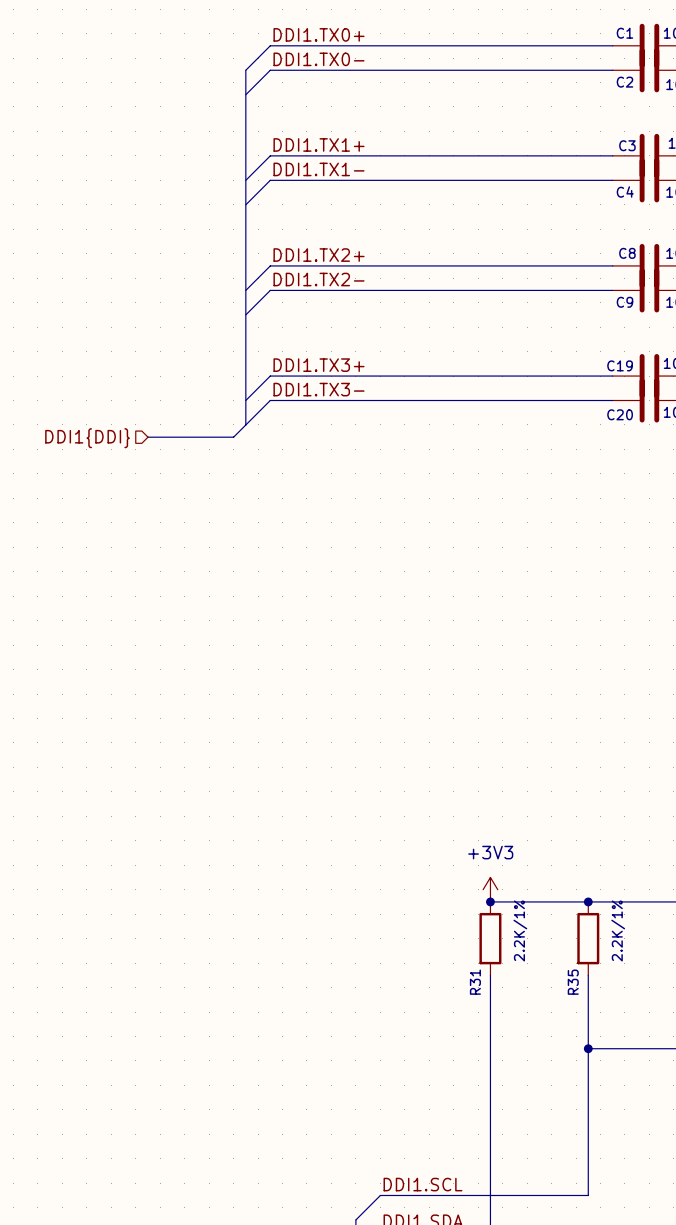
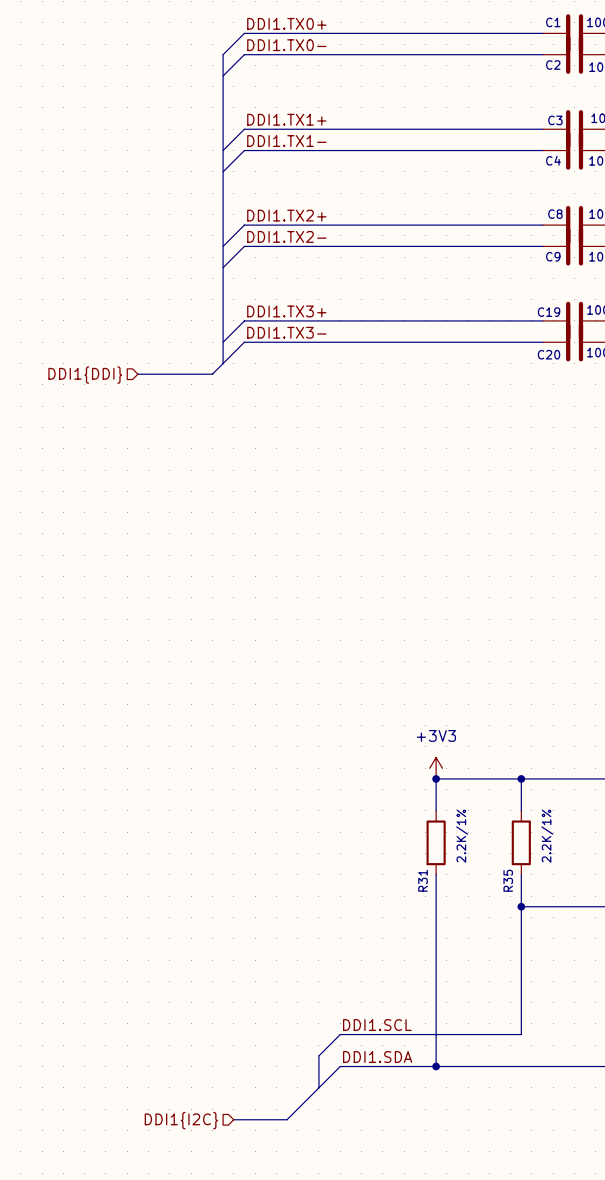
R31 position: (490, 938) -> (436, 842)
R35 position: (588, 938) -> (521, 842)
wire: (490, 975) (490, 1012) -> (436, 778) (436, 810)
wire: (588, 975) (588, 1012) -> (521, 778) (521, 810)

